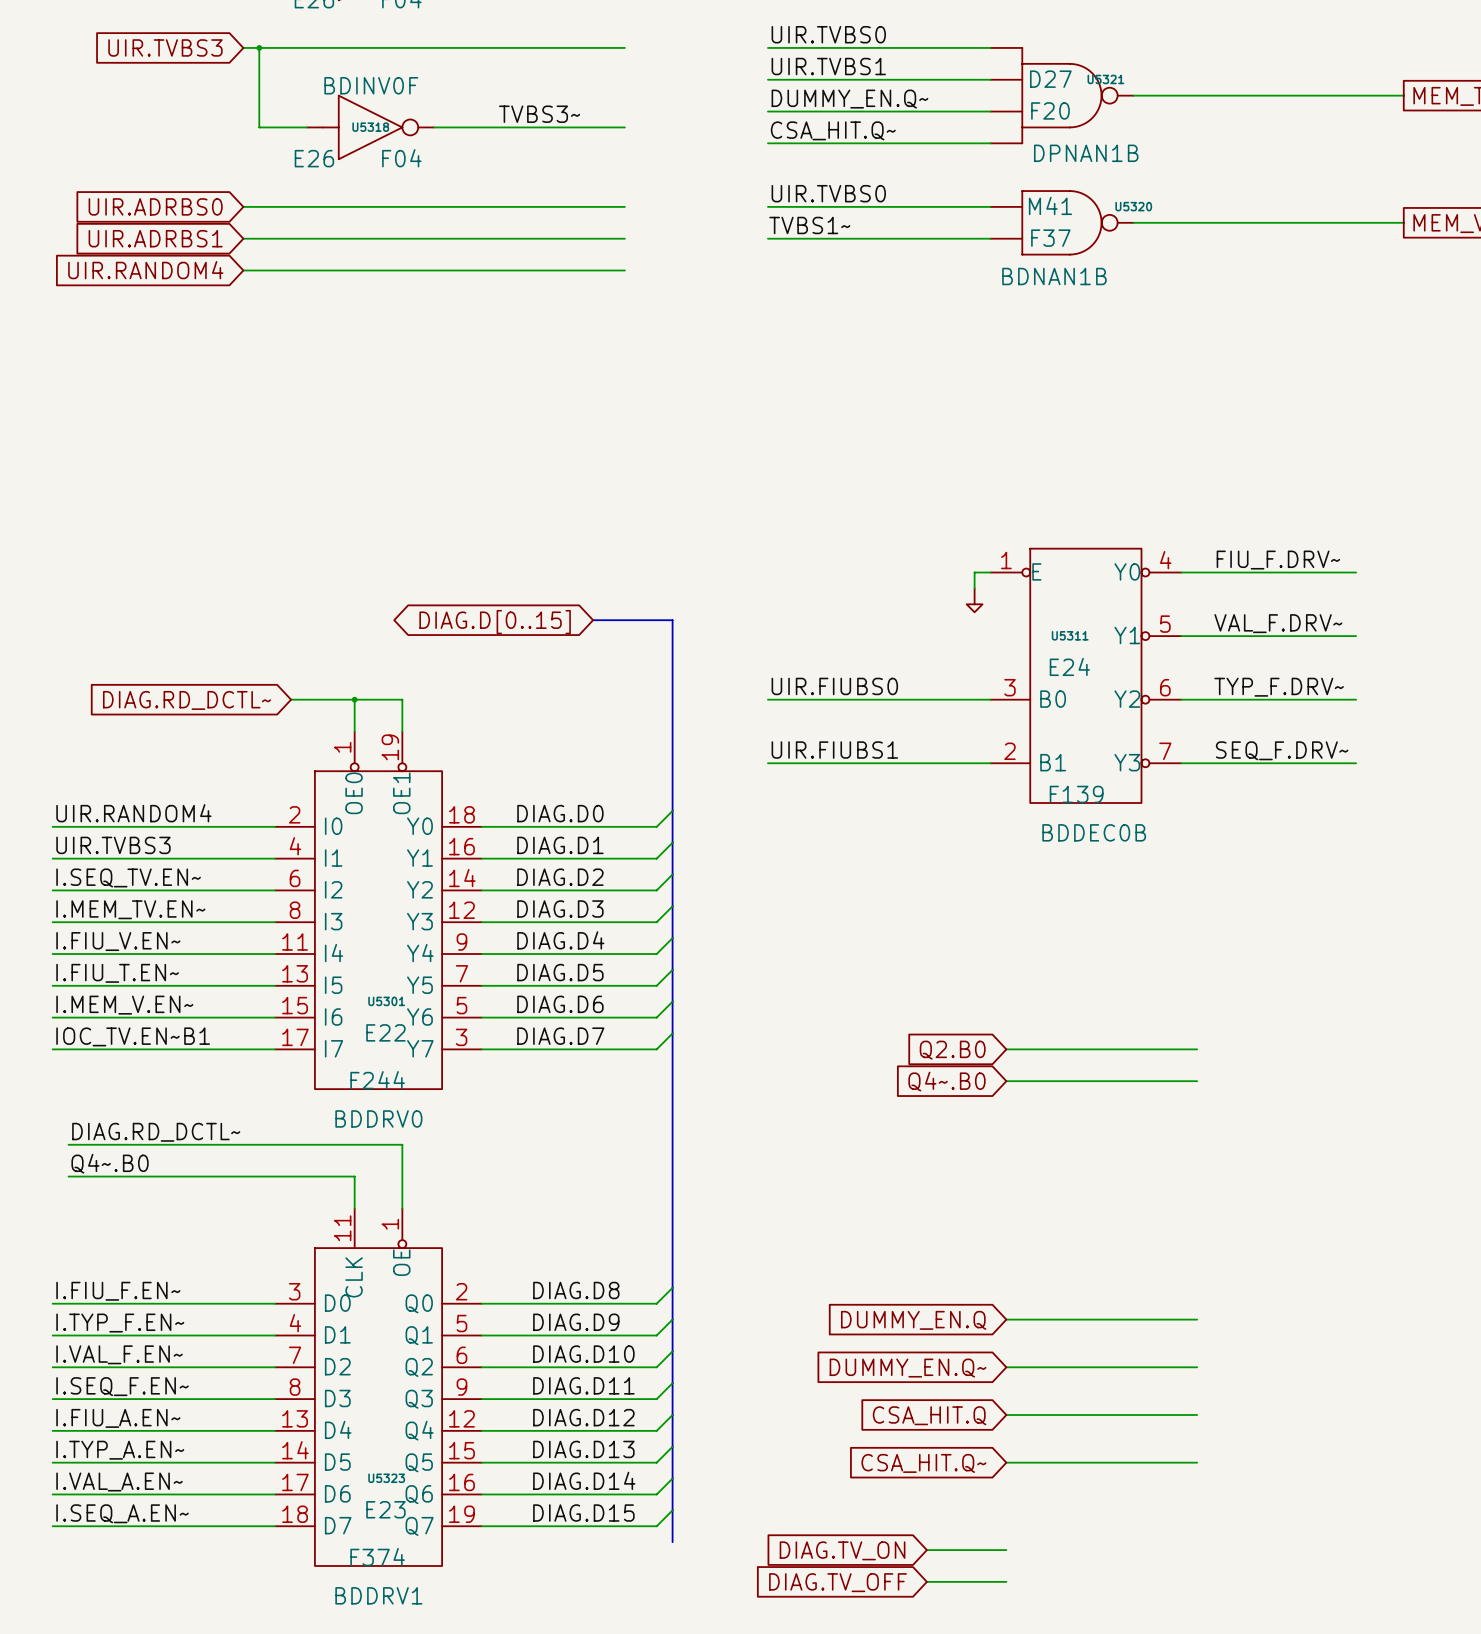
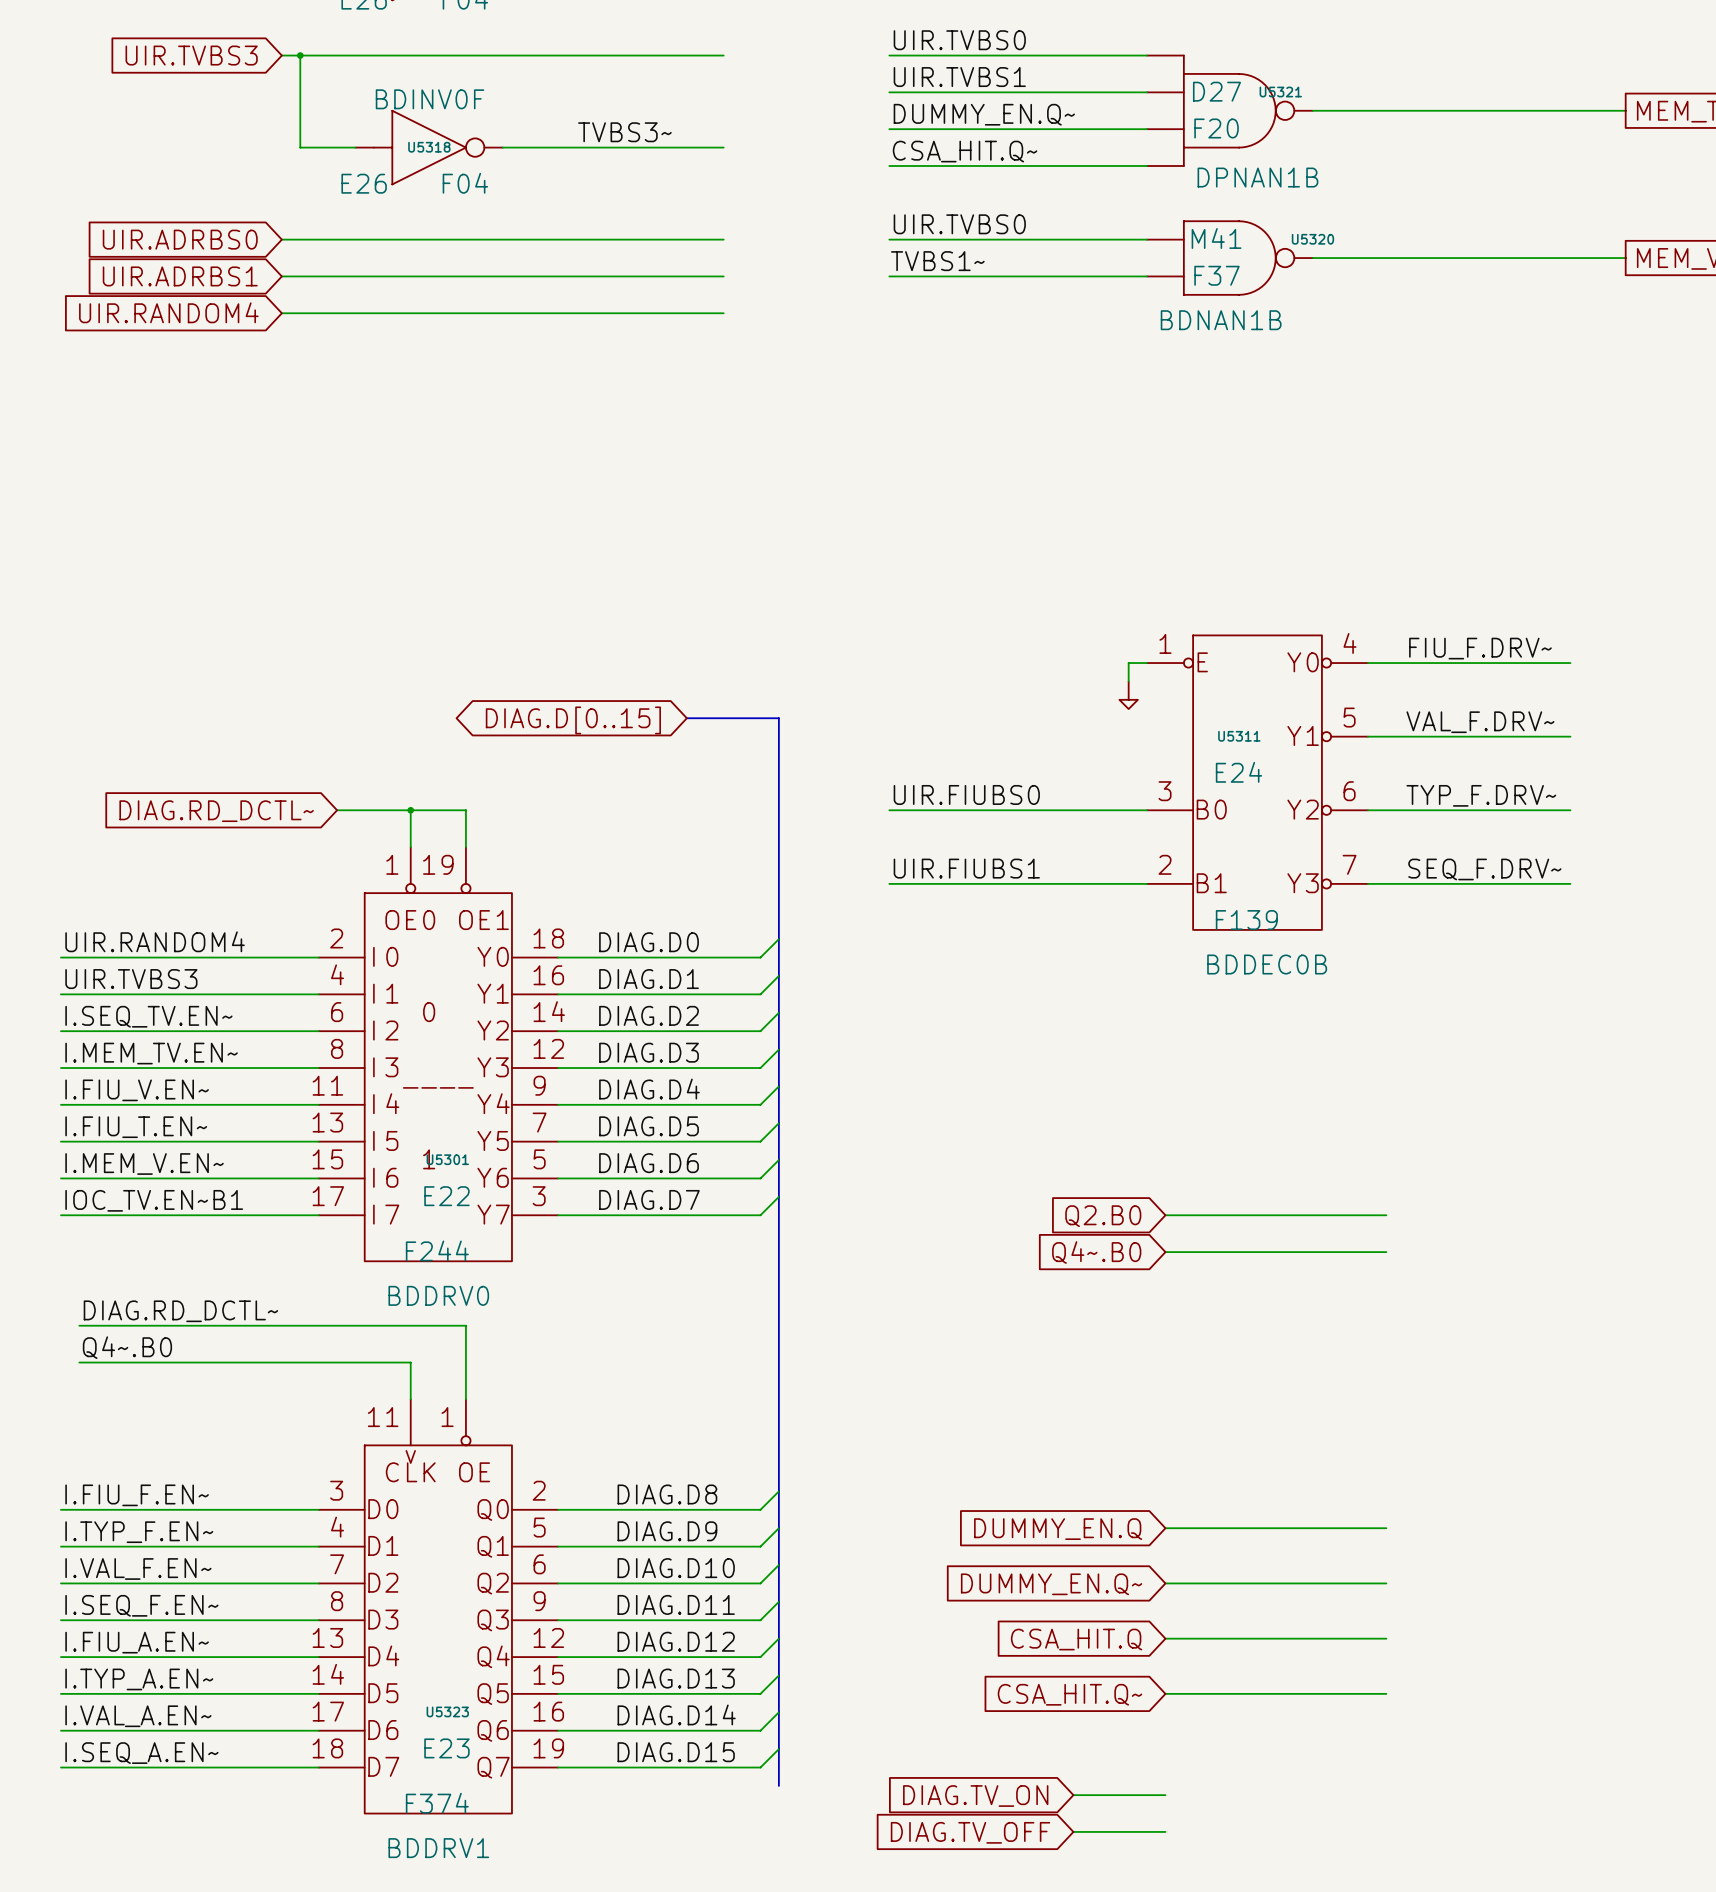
U5311 symbol: [990, 548, 1182, 804] -> [1147, 635, 1368, 930]
U5301 symbol: [275, 731, 482, 1090] -> [318, 847, 559, 1262]
U5323 symbol: [275, 1208, 482, 1566] -> [318, 1399, 559, 1814]

